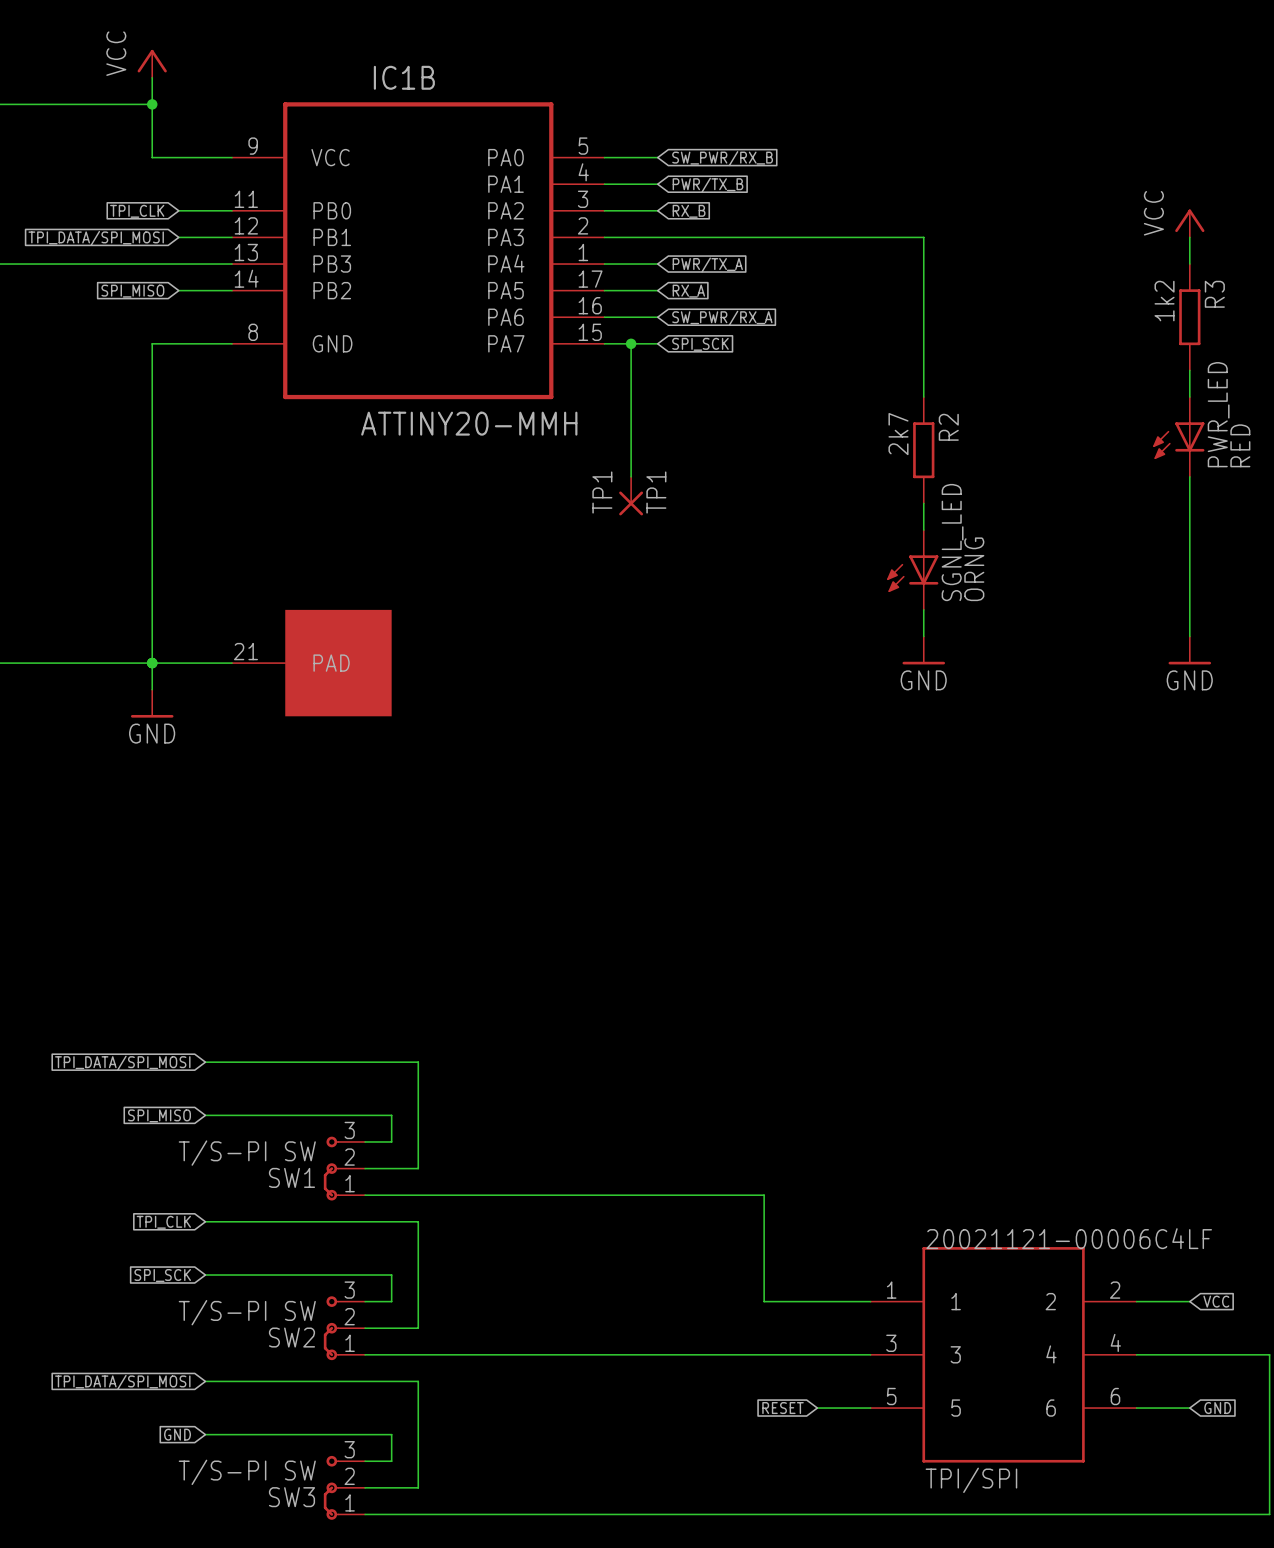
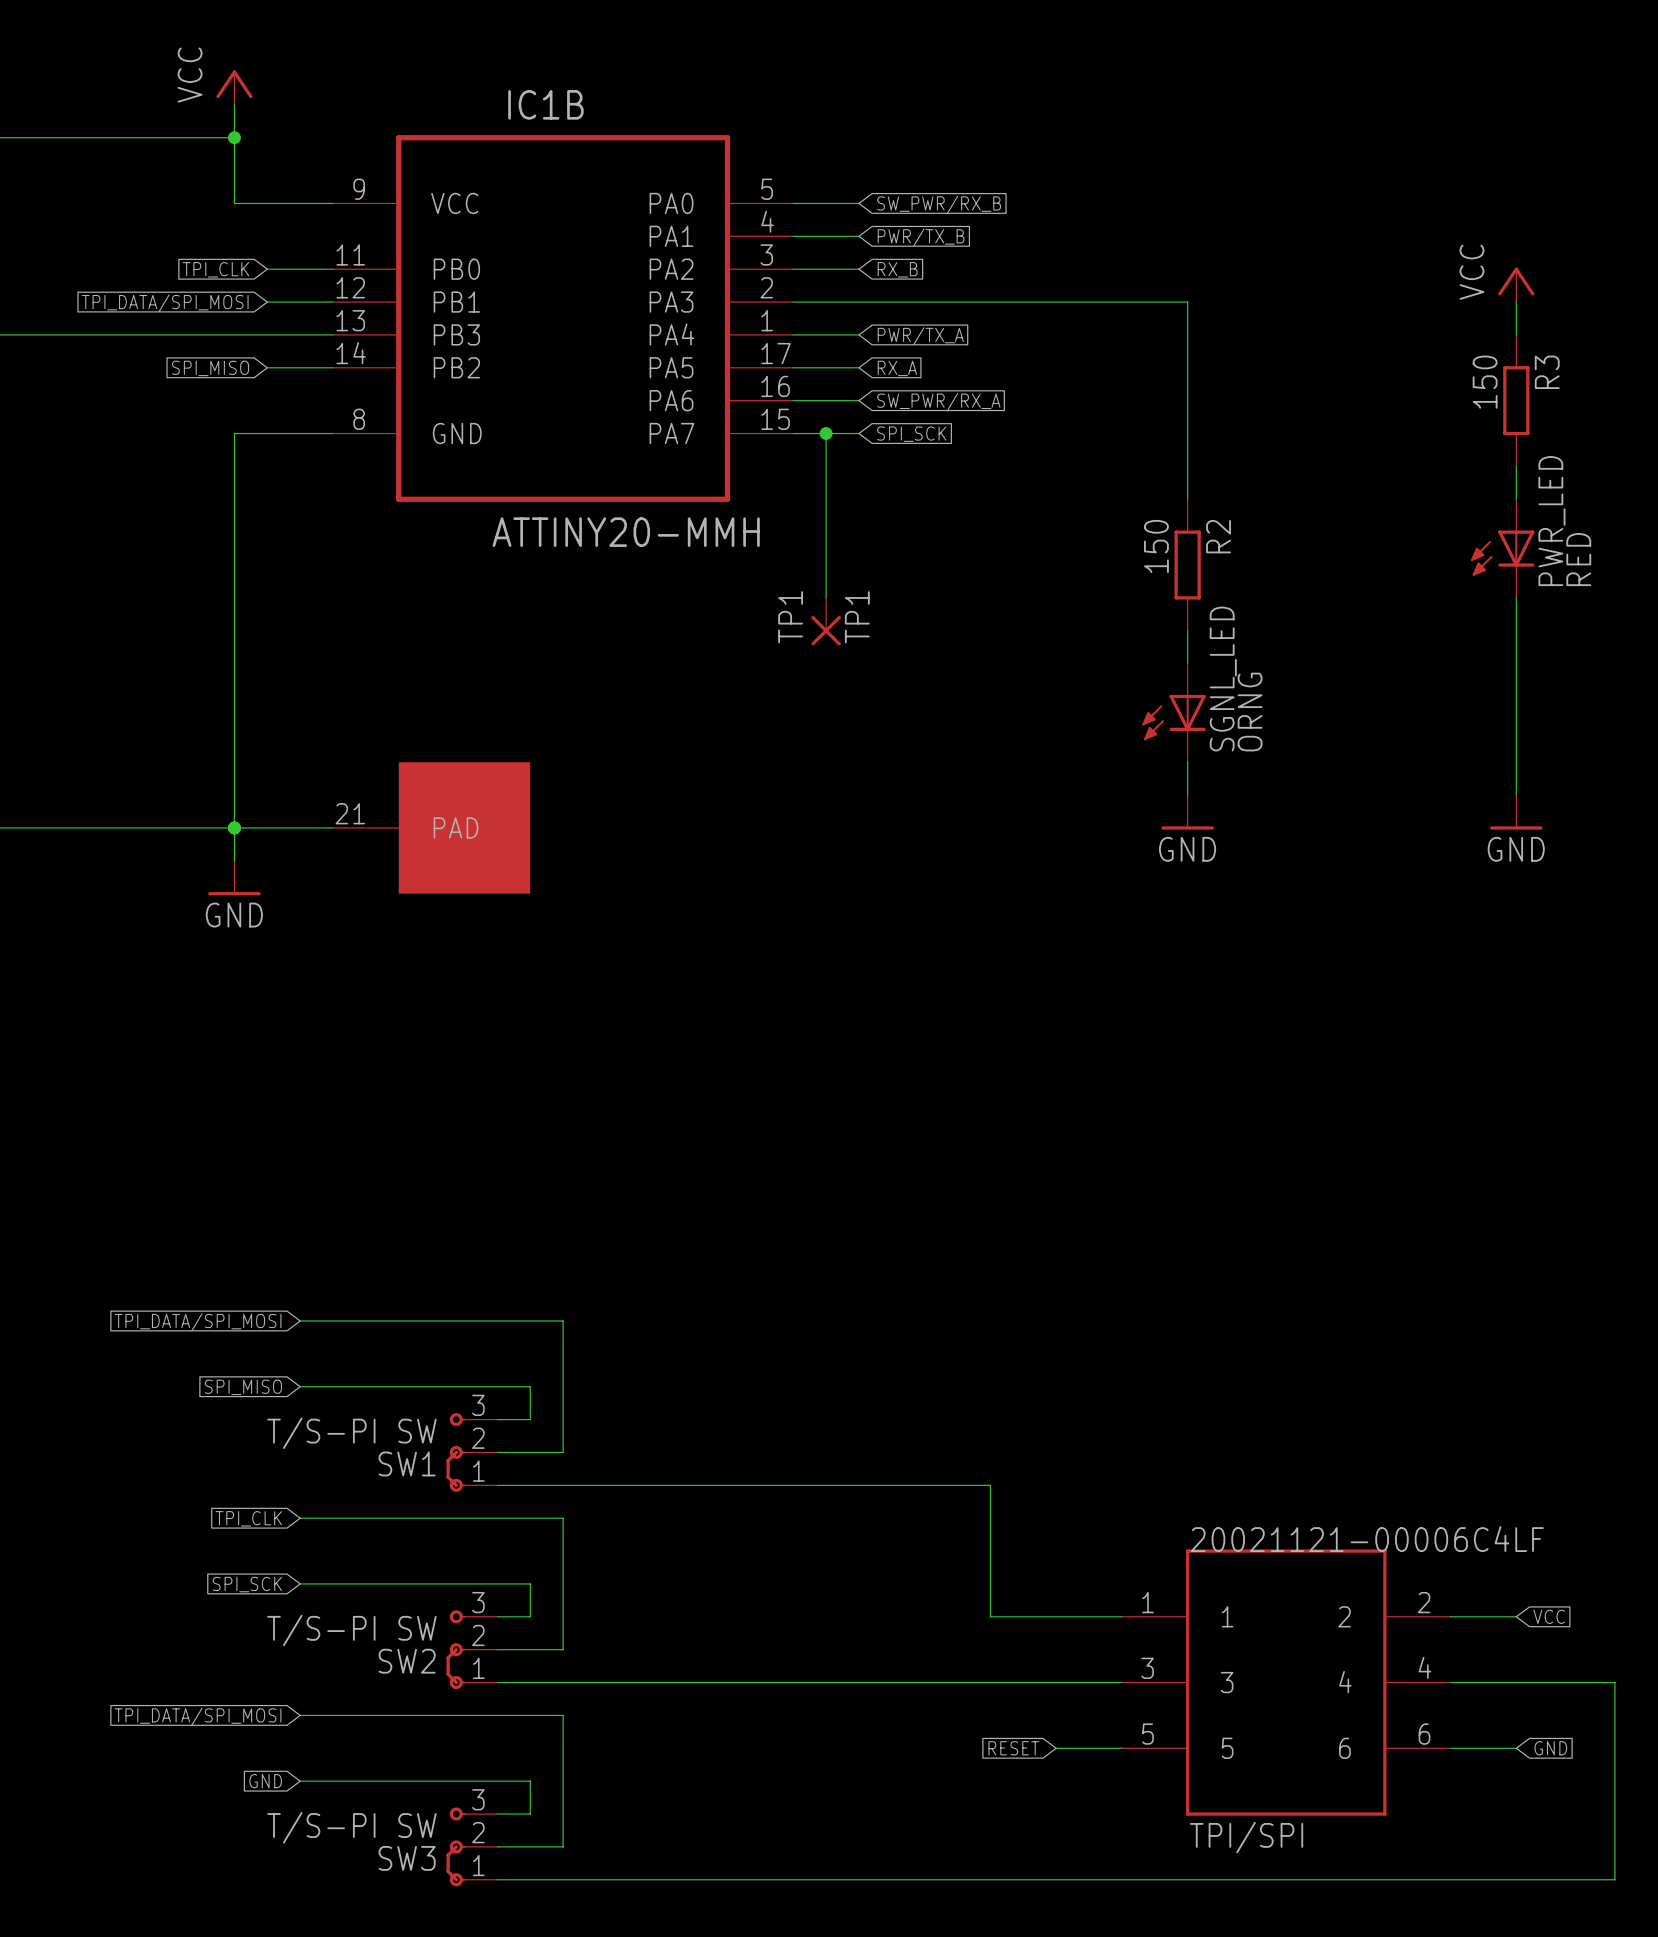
R3 value: 1k2 (1164, 301) -> 150 (1485, 382)
R2 value: 2k7 (898, 434) -> 150 (1156, 546)

